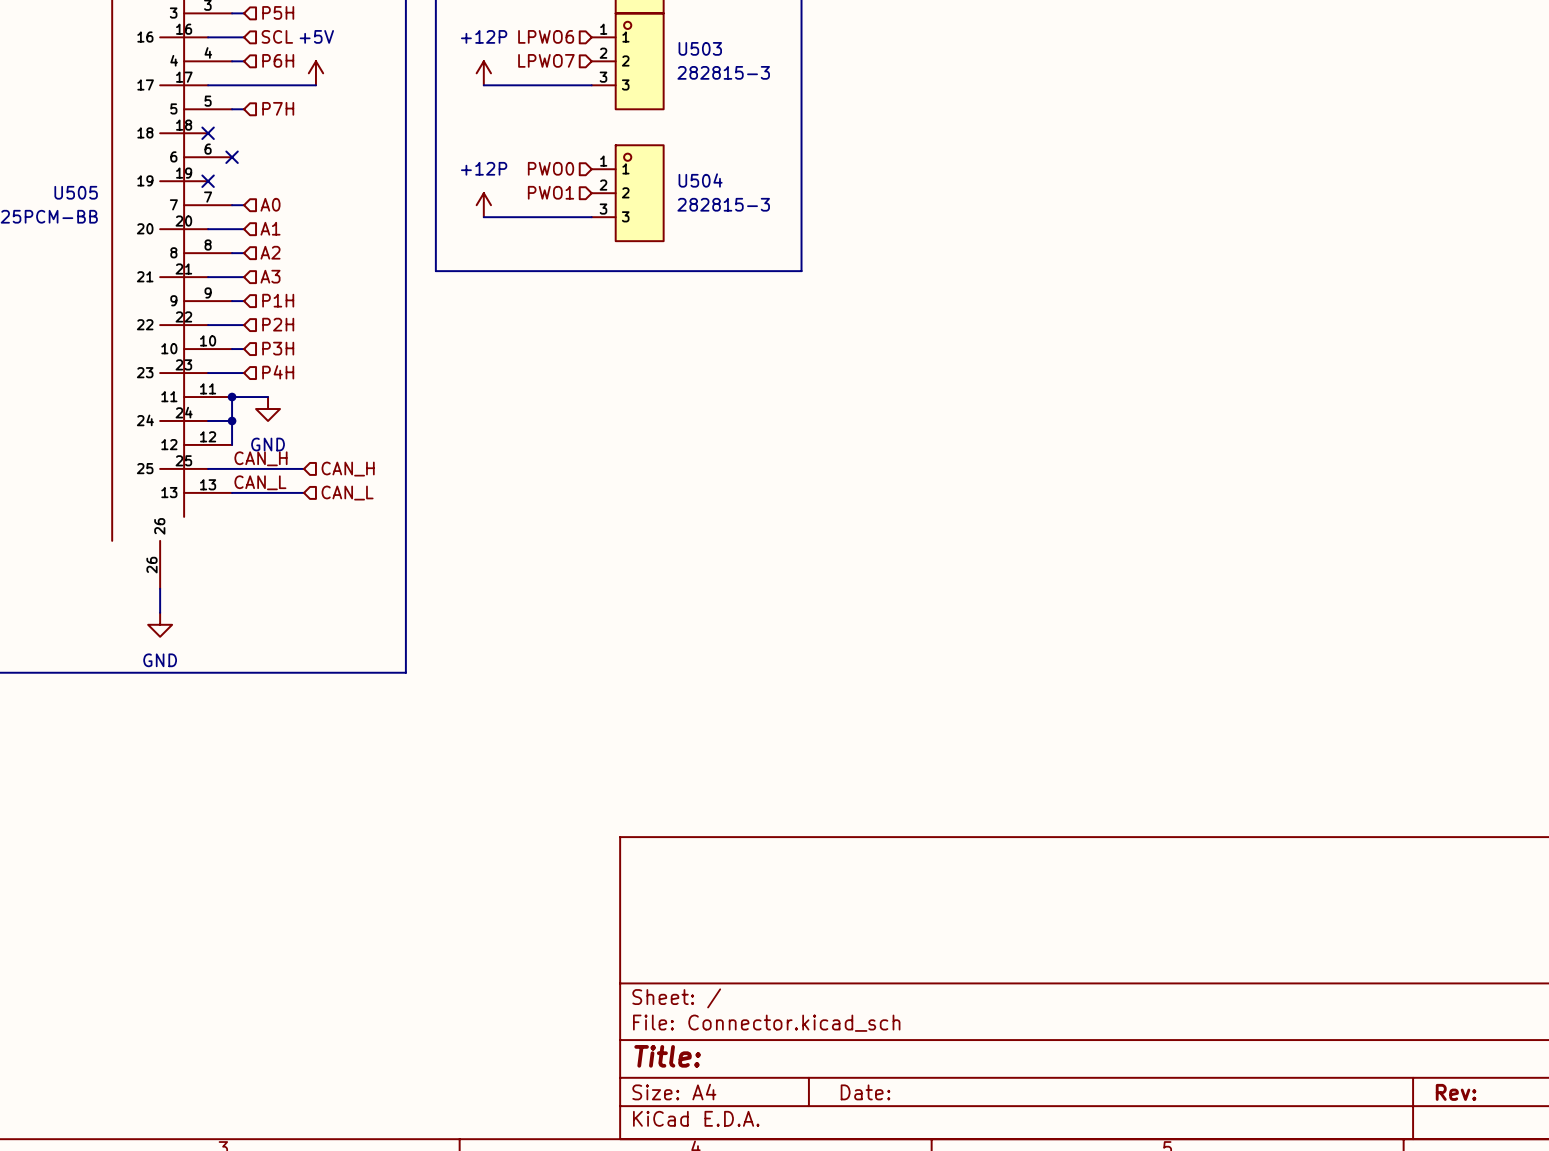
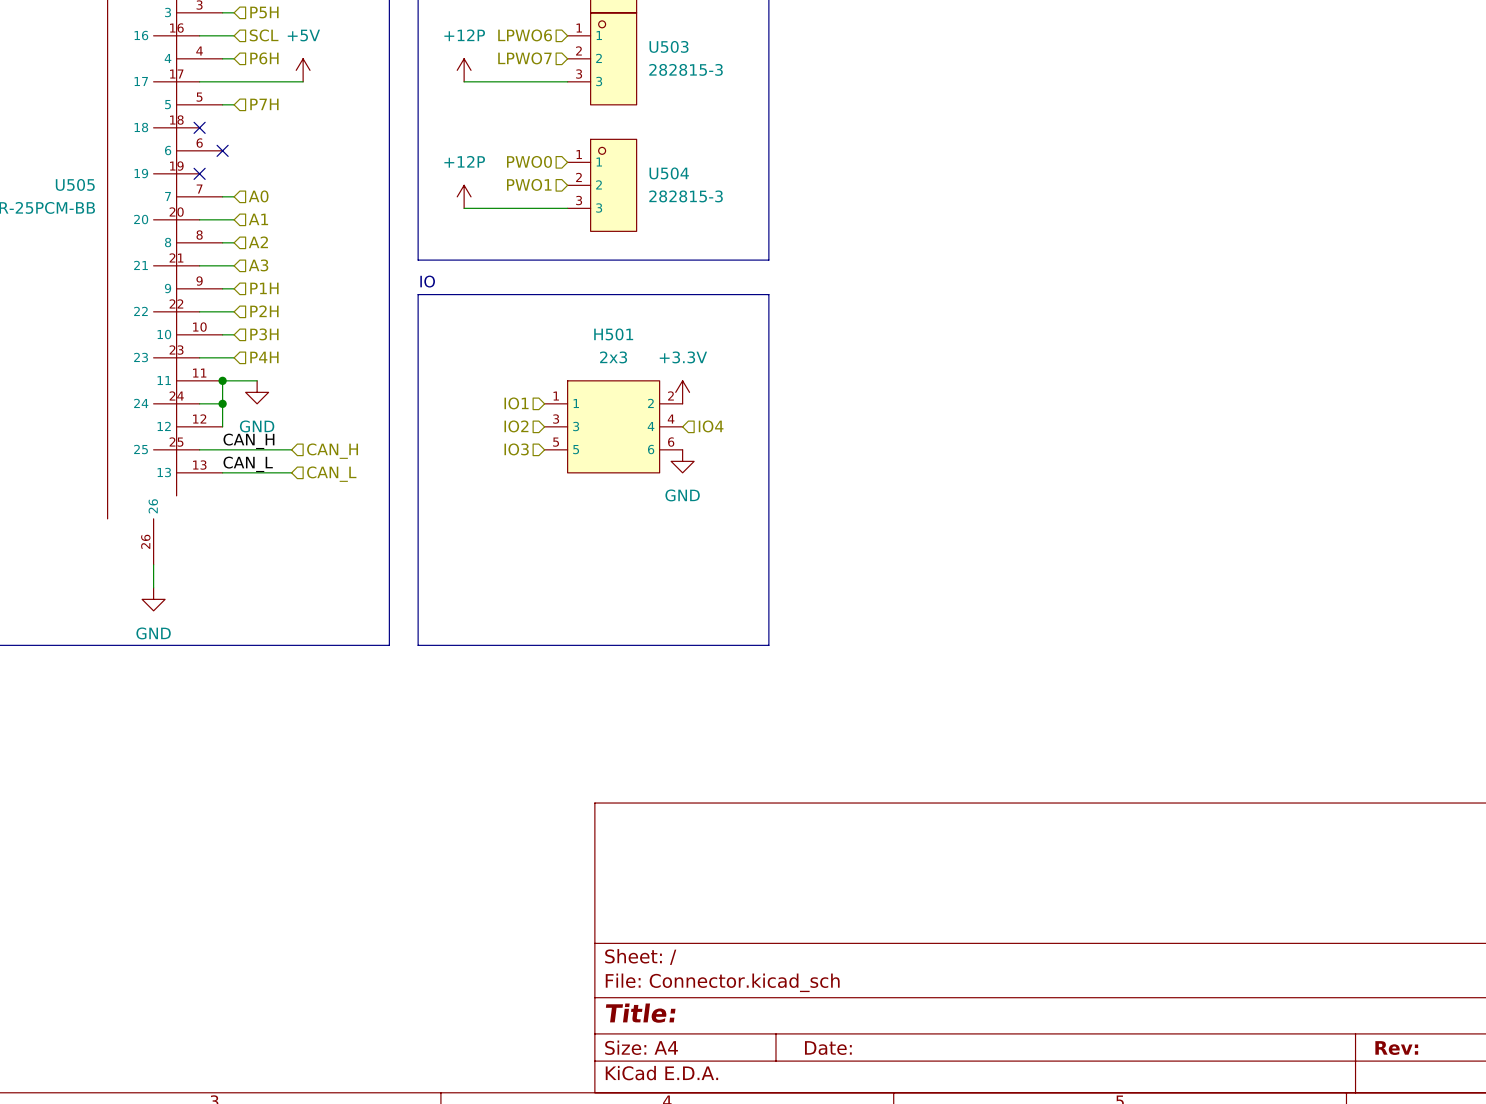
text: none -> IO (427, 281)
line: none -> (418, 294) (768, 294) (768, 645) (418, 645) (418, 294)
power symbol: none -> +3.3V (682, 392)
hierarchical label: none -> IO1 (516, 403)
hierarchical label: none -> IO2 (516, 426)
H501: none -> 2x3 (613, 426)
hierarchical label: none -> IO4 (711, 426)
hierarchical label: none -> IO3 (516, 449)
power symbol: none -> GND (682, 461)

